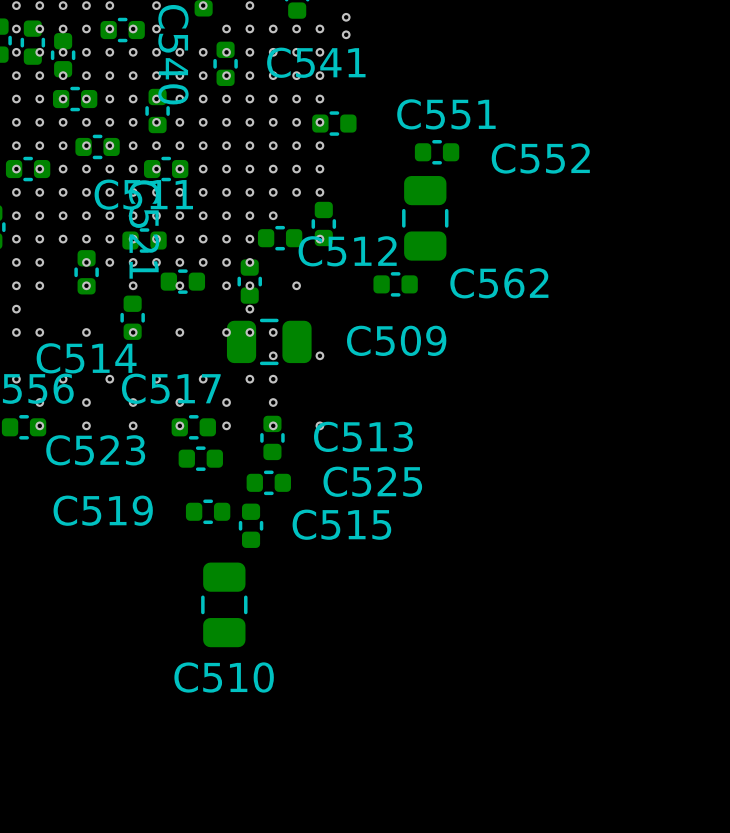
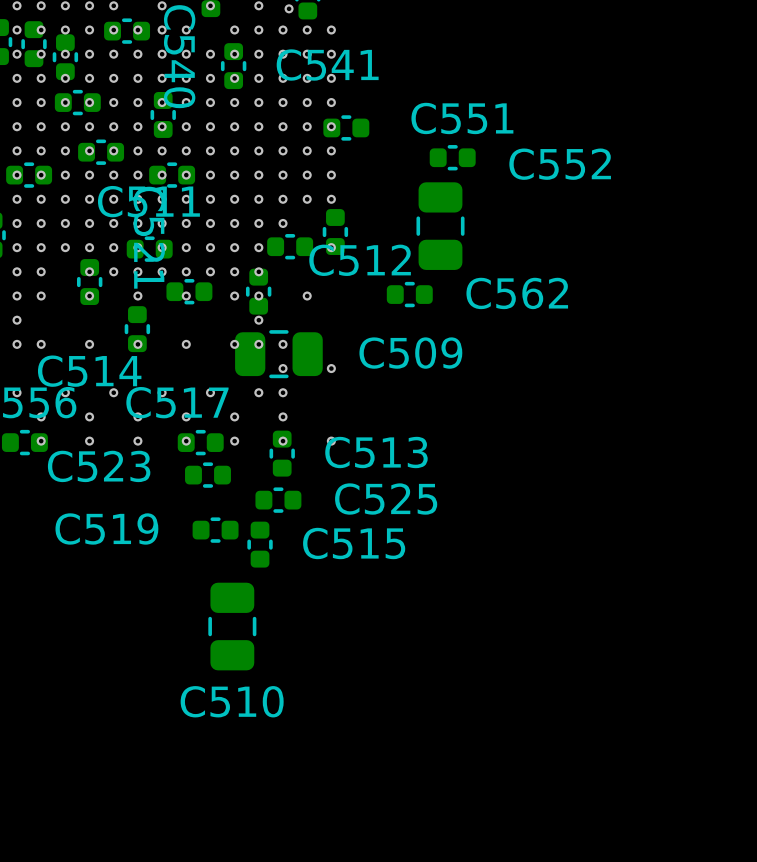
via: none -> (289, 8)
via: (346, 17) -> none
via: none -> (186, 30)
via: (346, 34) -> none

